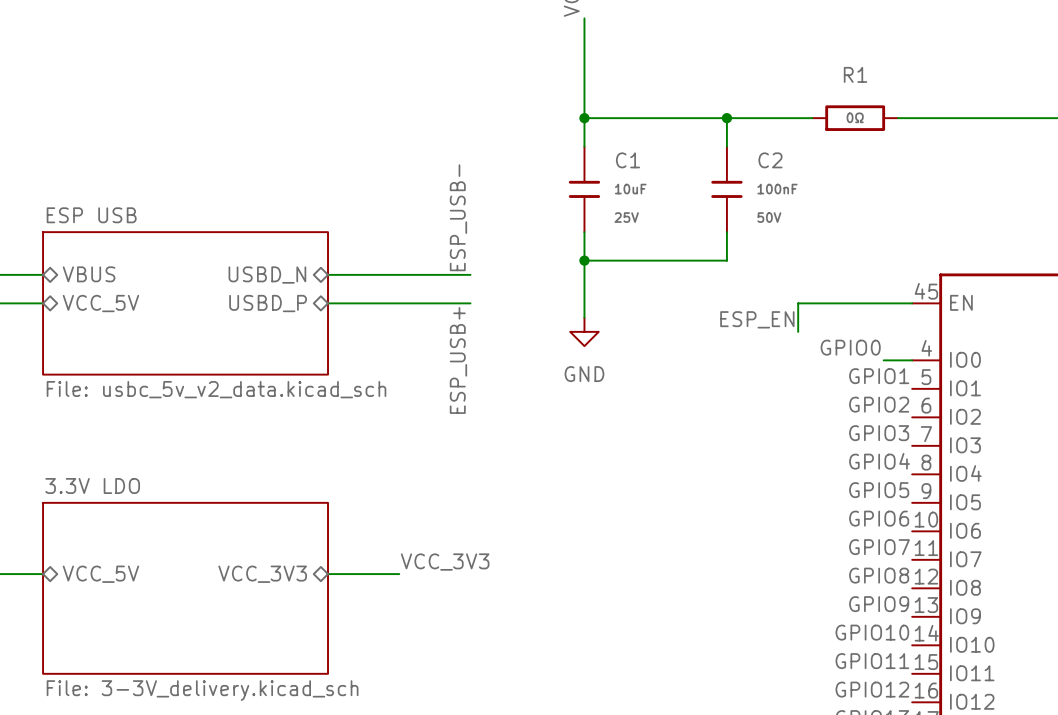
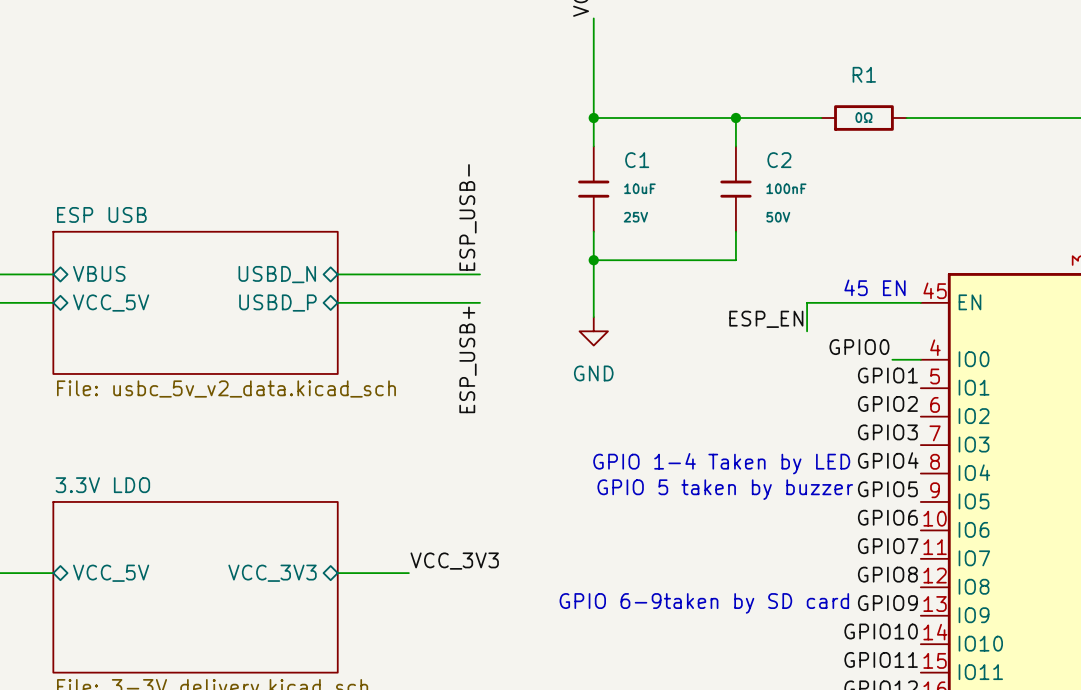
text: none -> 45 EN (874, 287)
text: none -> GPIO 1-4 Taken by LED (721, 463)
text: none -> GPIO 5 taken by buzzer (725, 489)
text: none -> GPIO 6-9taken by SD card (704, 603)

